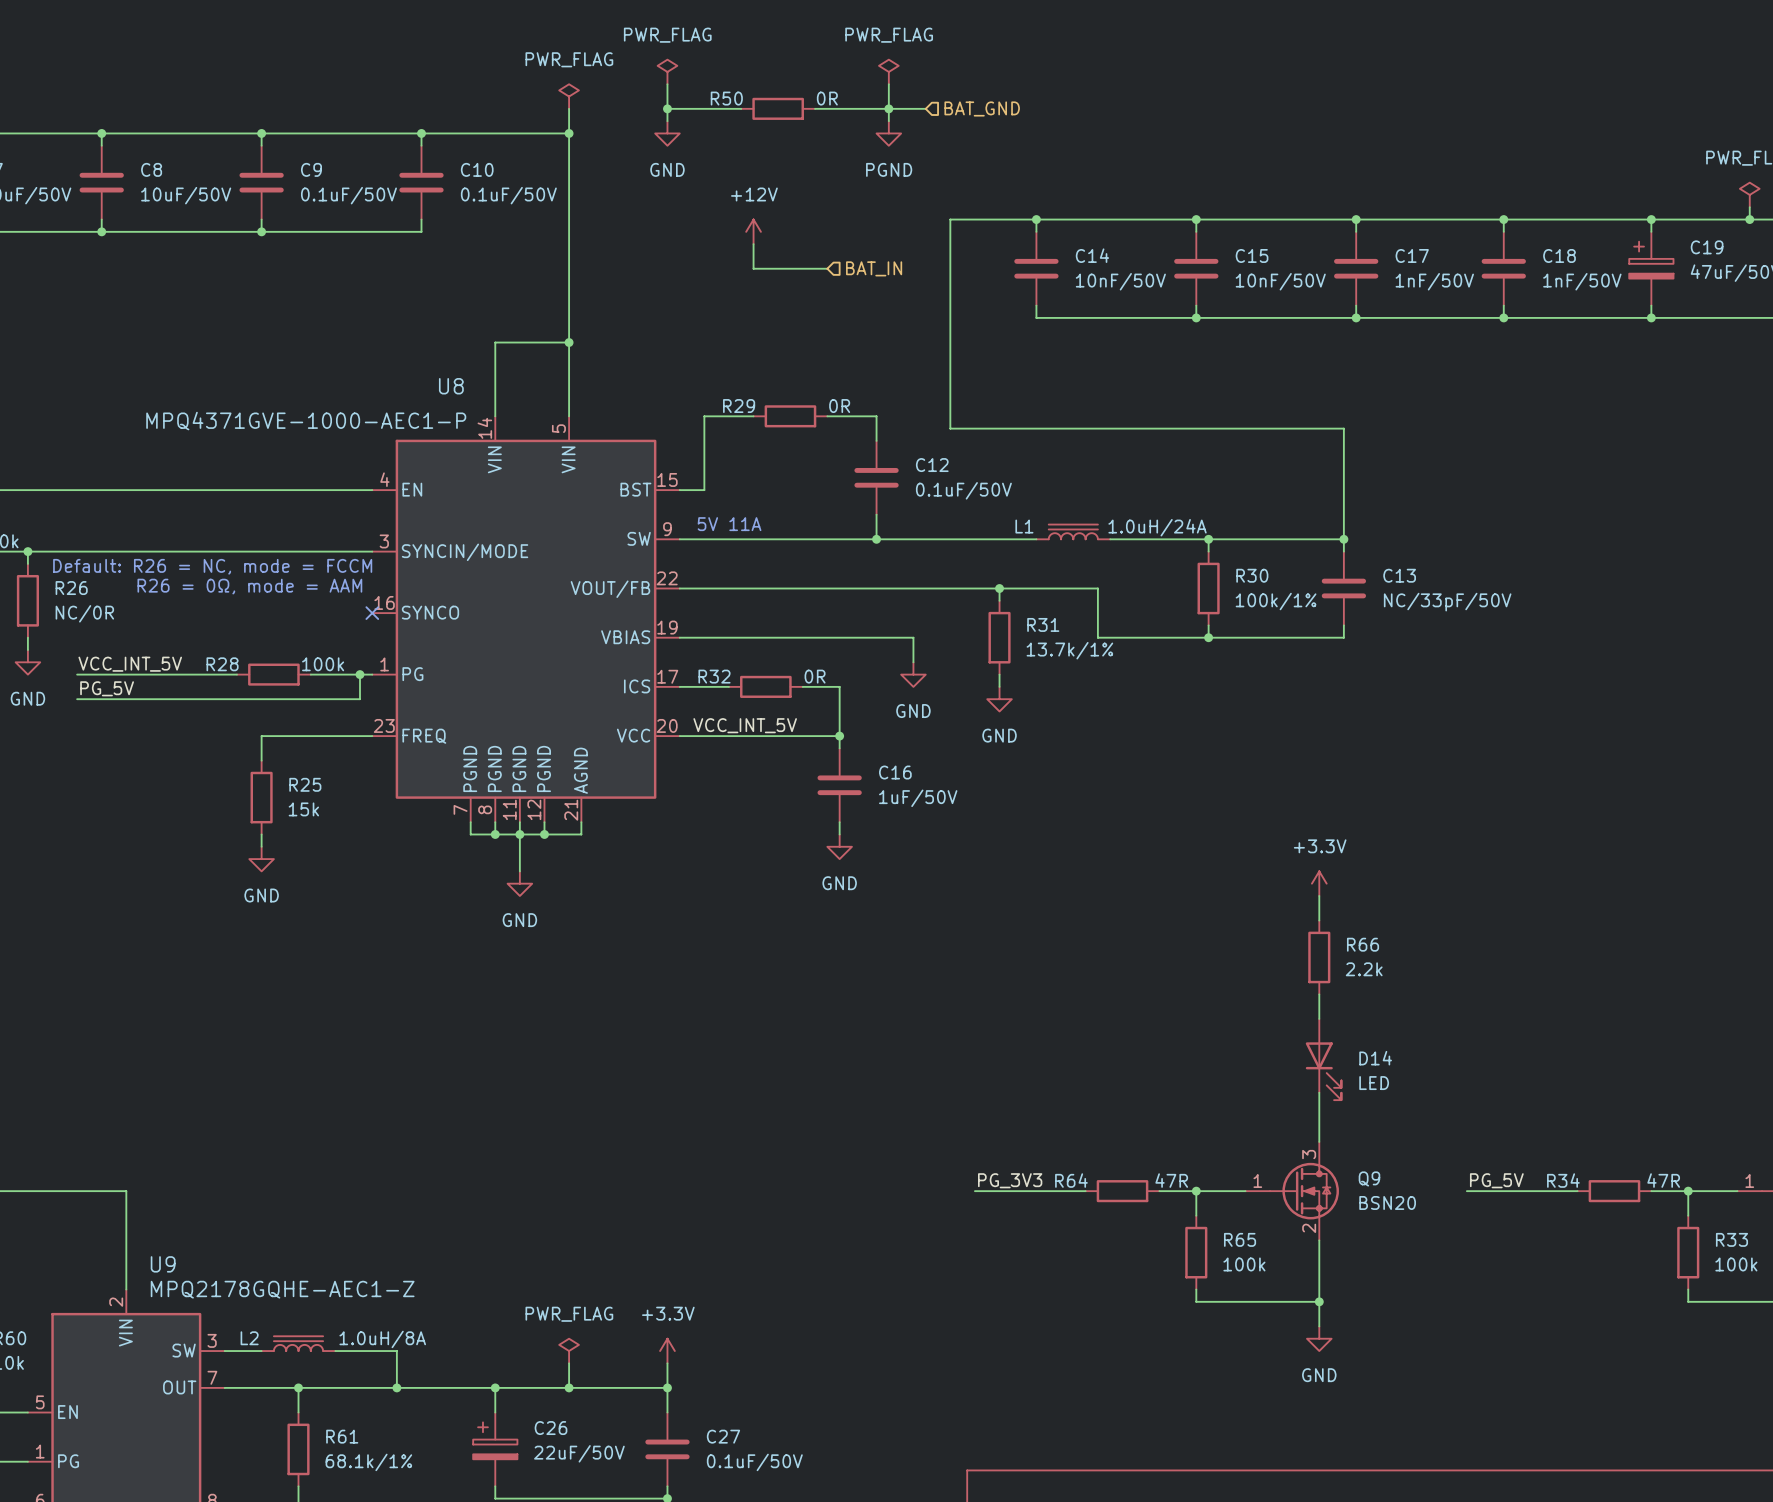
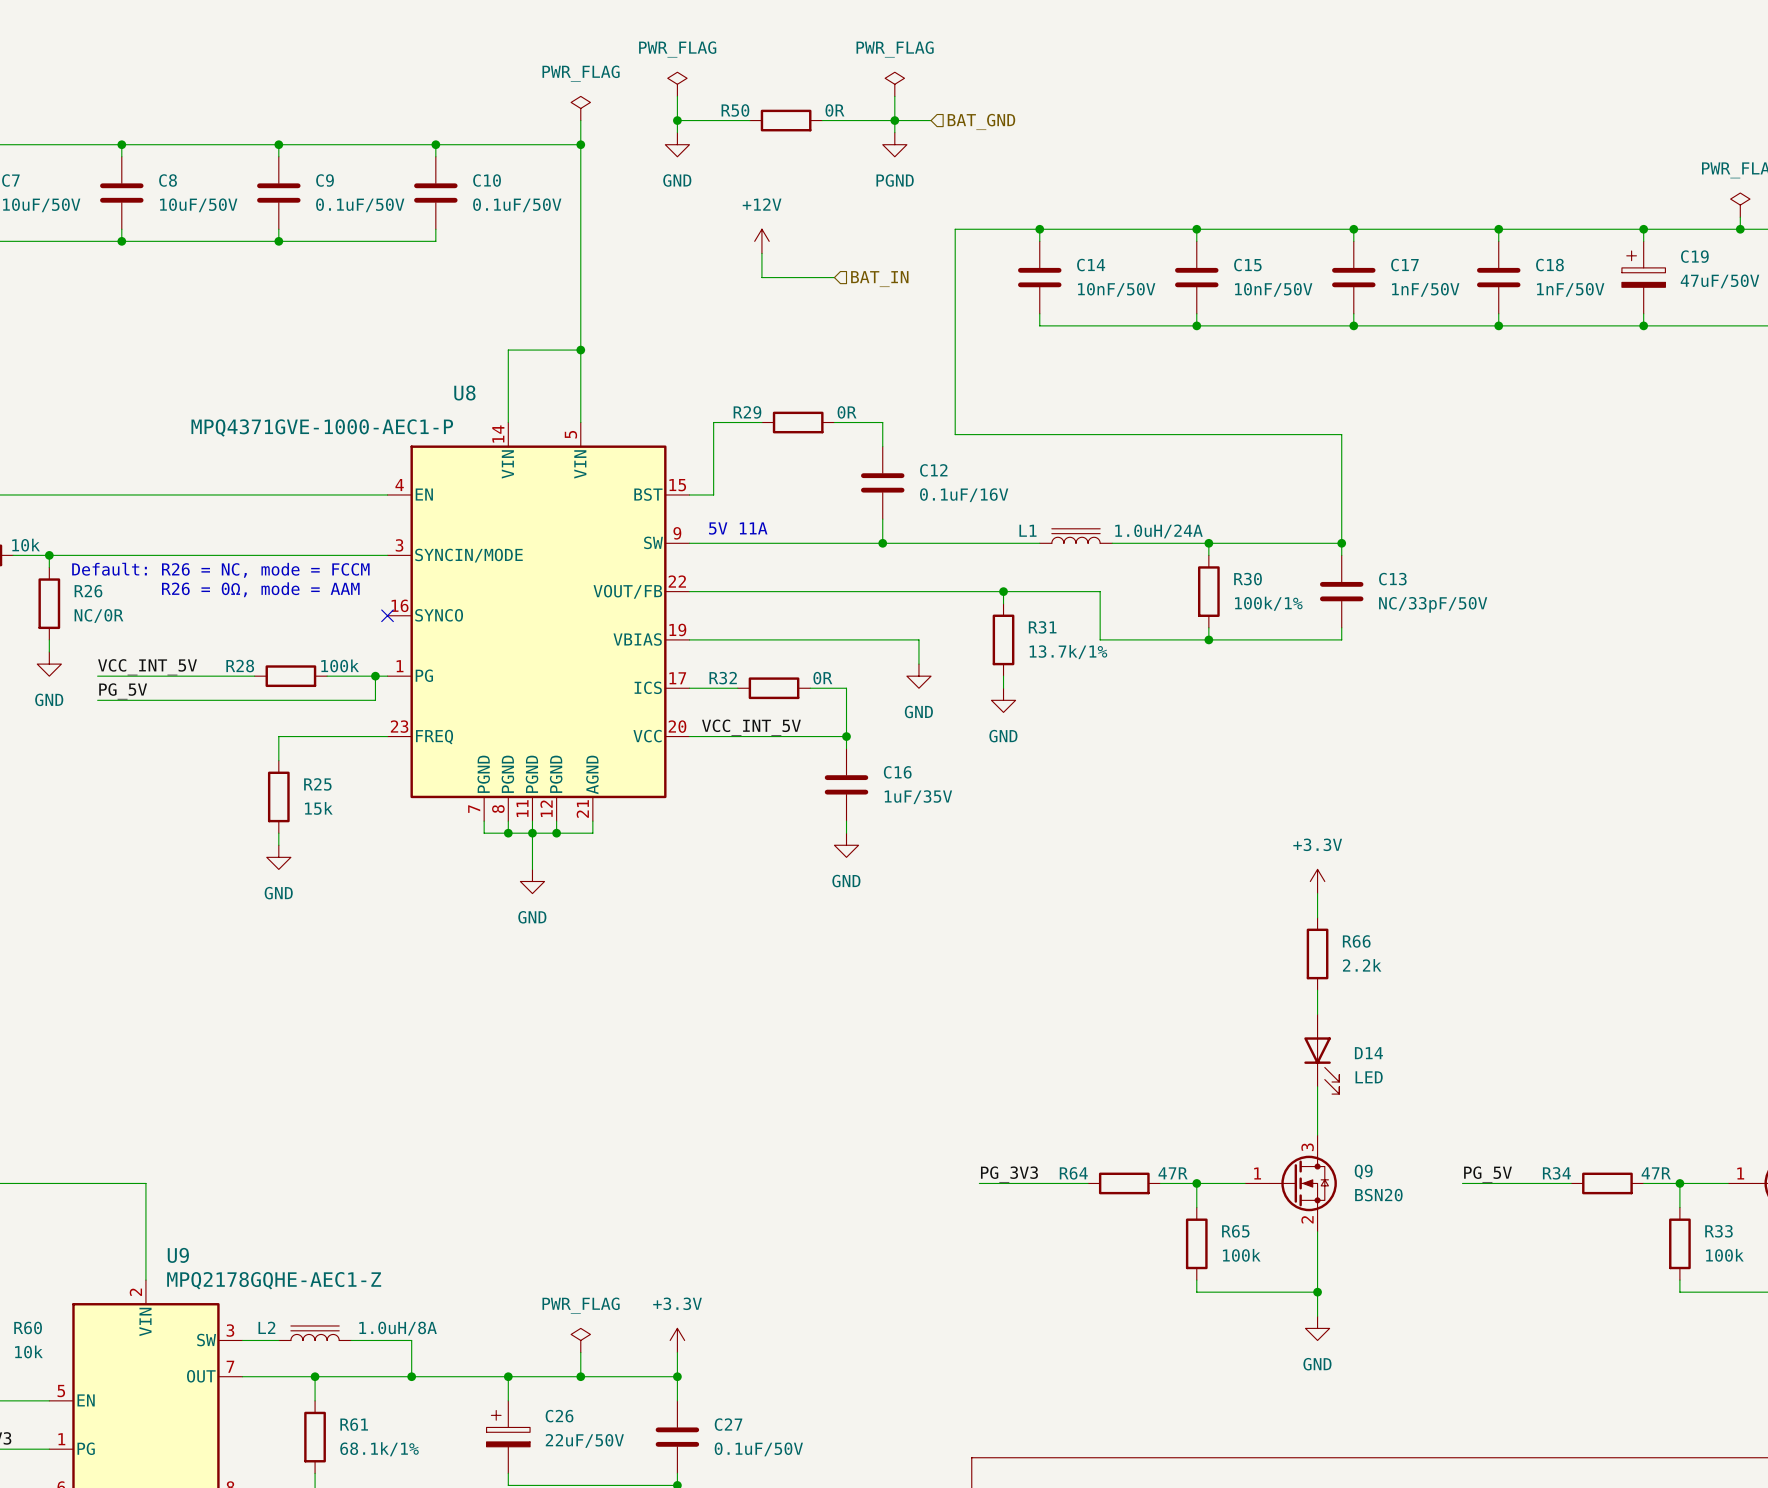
C12 value: 0.1uF/50V (963, 490) -> 0.1uF/16V (964, 495)
C16 value: 1uF/50V (918, 798) -> 1uF/35V (918, 797)

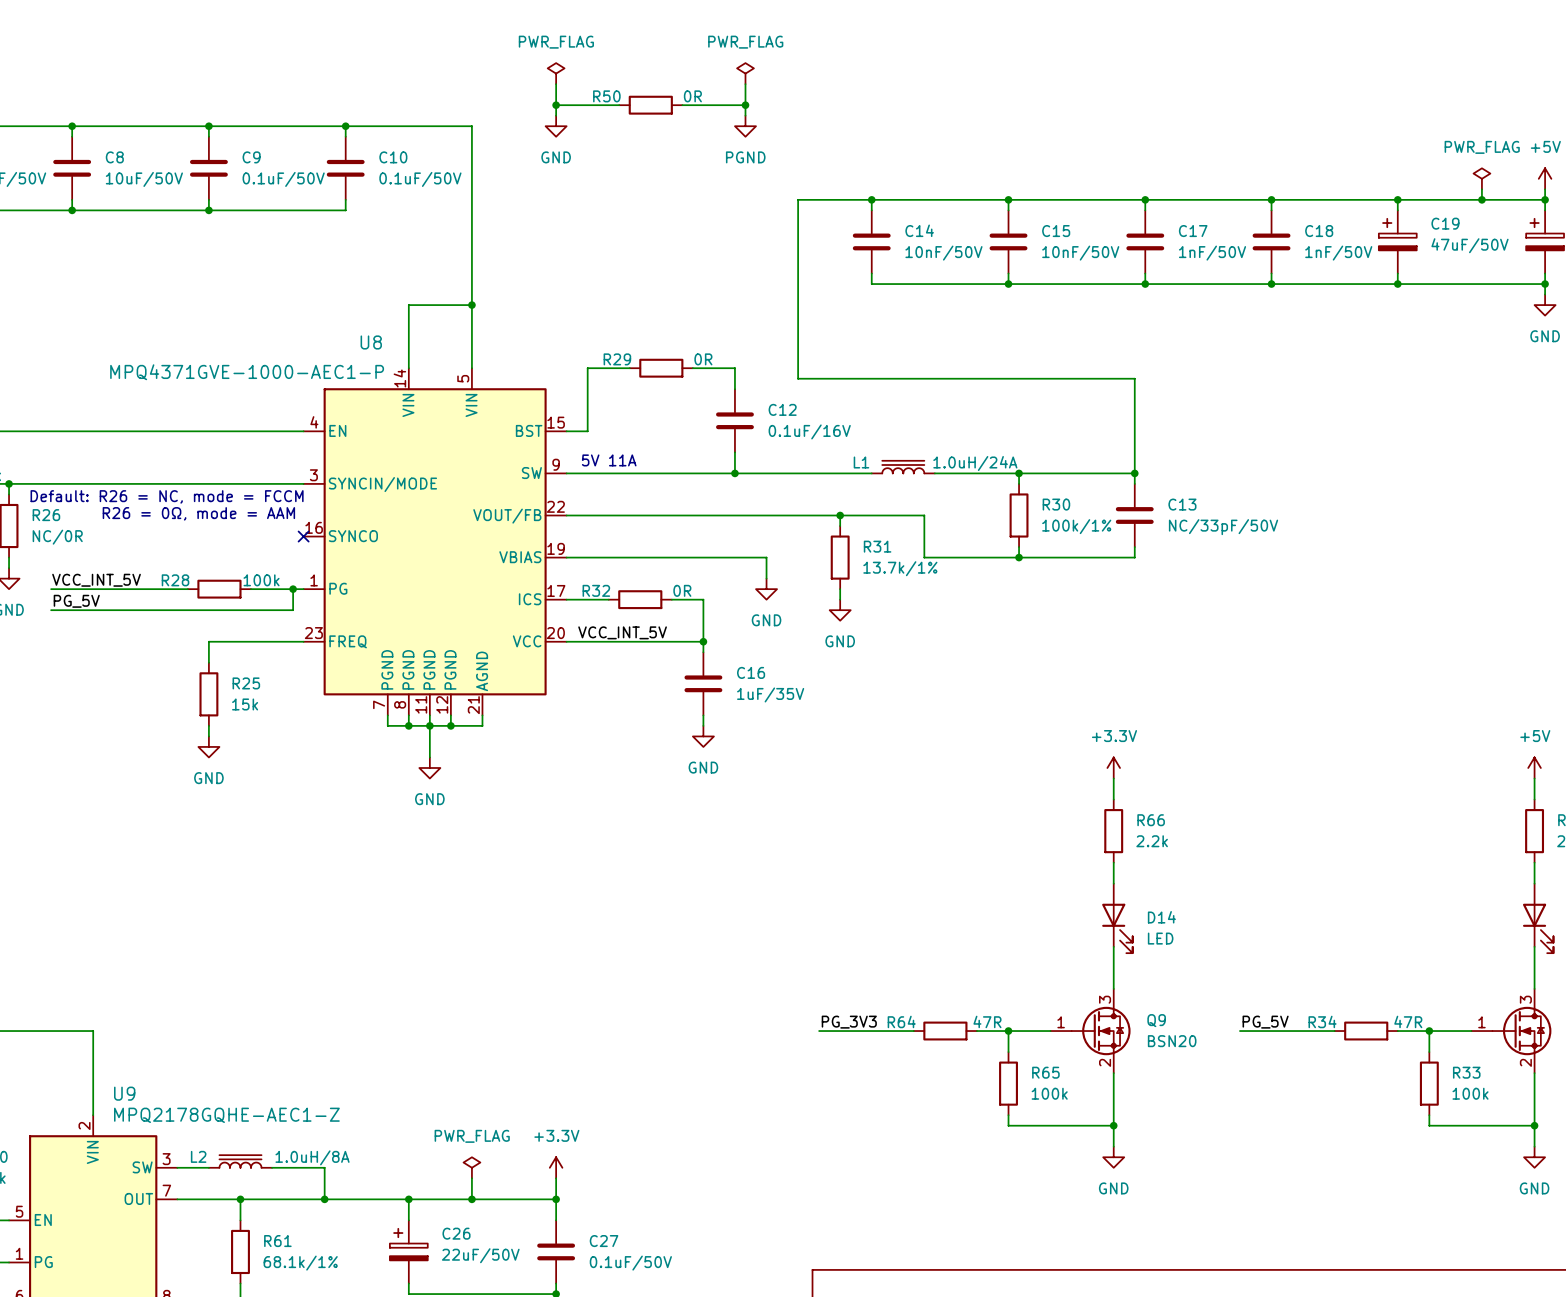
power symbol: PWR_FLAG (580, 108) -> none
wire: (580, 120) (580, 144) -> none
wire: (894, 120) (931, 120) -> none
hierarchical label: BAT_GND (981, 121) -> none
junction: (580, 144) -> none
power symbol: +12V (761, 241) -> none
wire: (761, 253) (761, 277) (834, 277) -> none
hierarchical label: BAT_IN (879, 279) -> none

